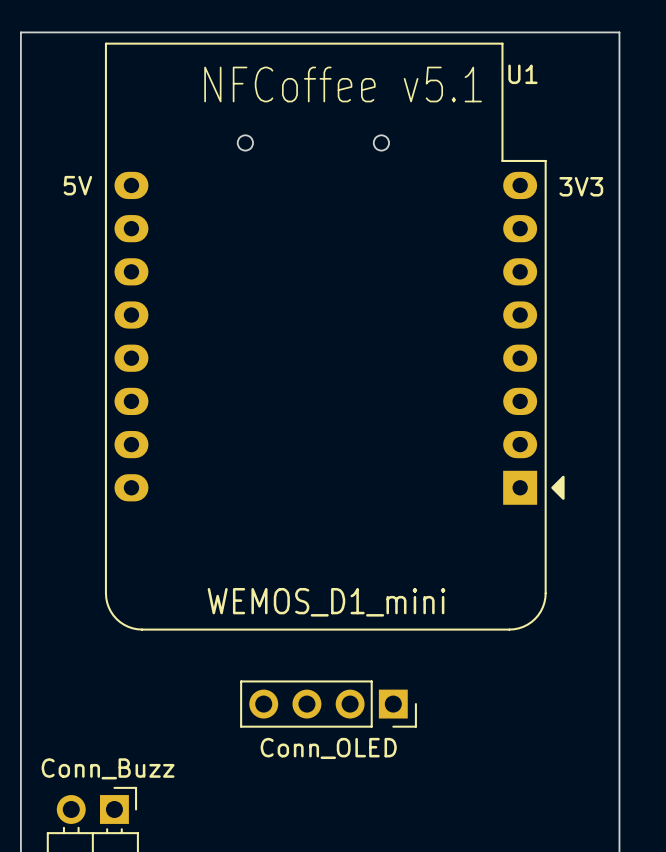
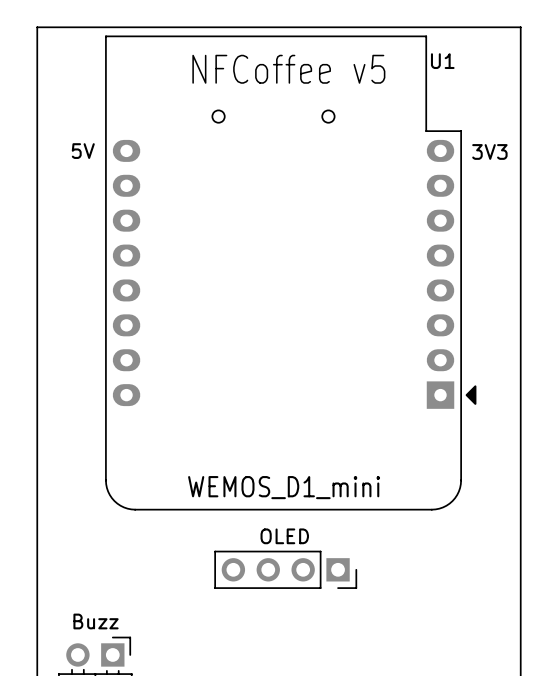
text: NFCoffee v5.1 (343, 84) -> NFCoffee v5 (288, 69)
part value: Conn_OLED (328, 748) -> OLED (284, 536)
part value: Conn_Buzz (108, 768) -> Buzz (96, 621)

